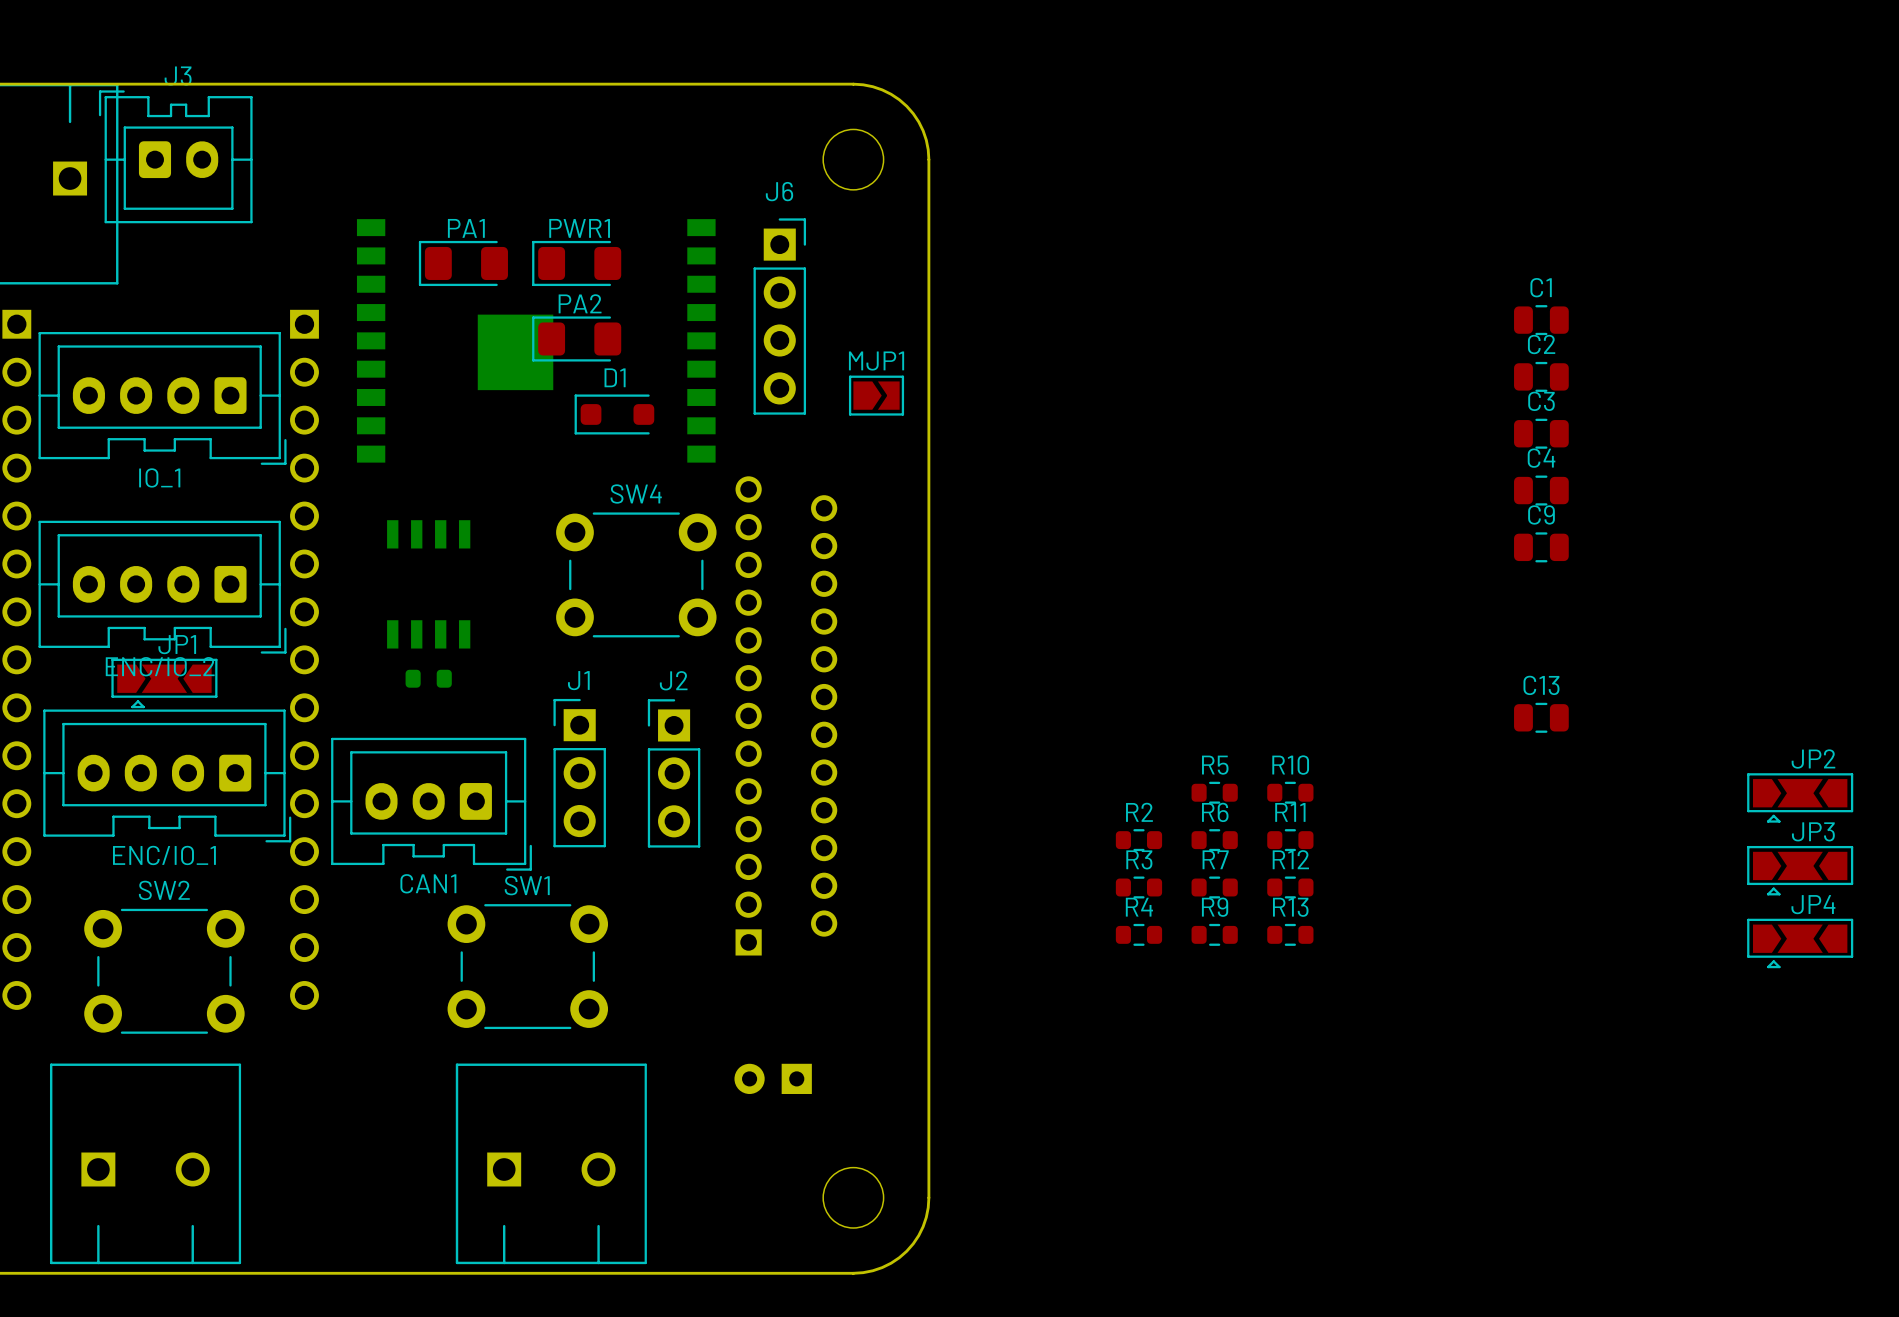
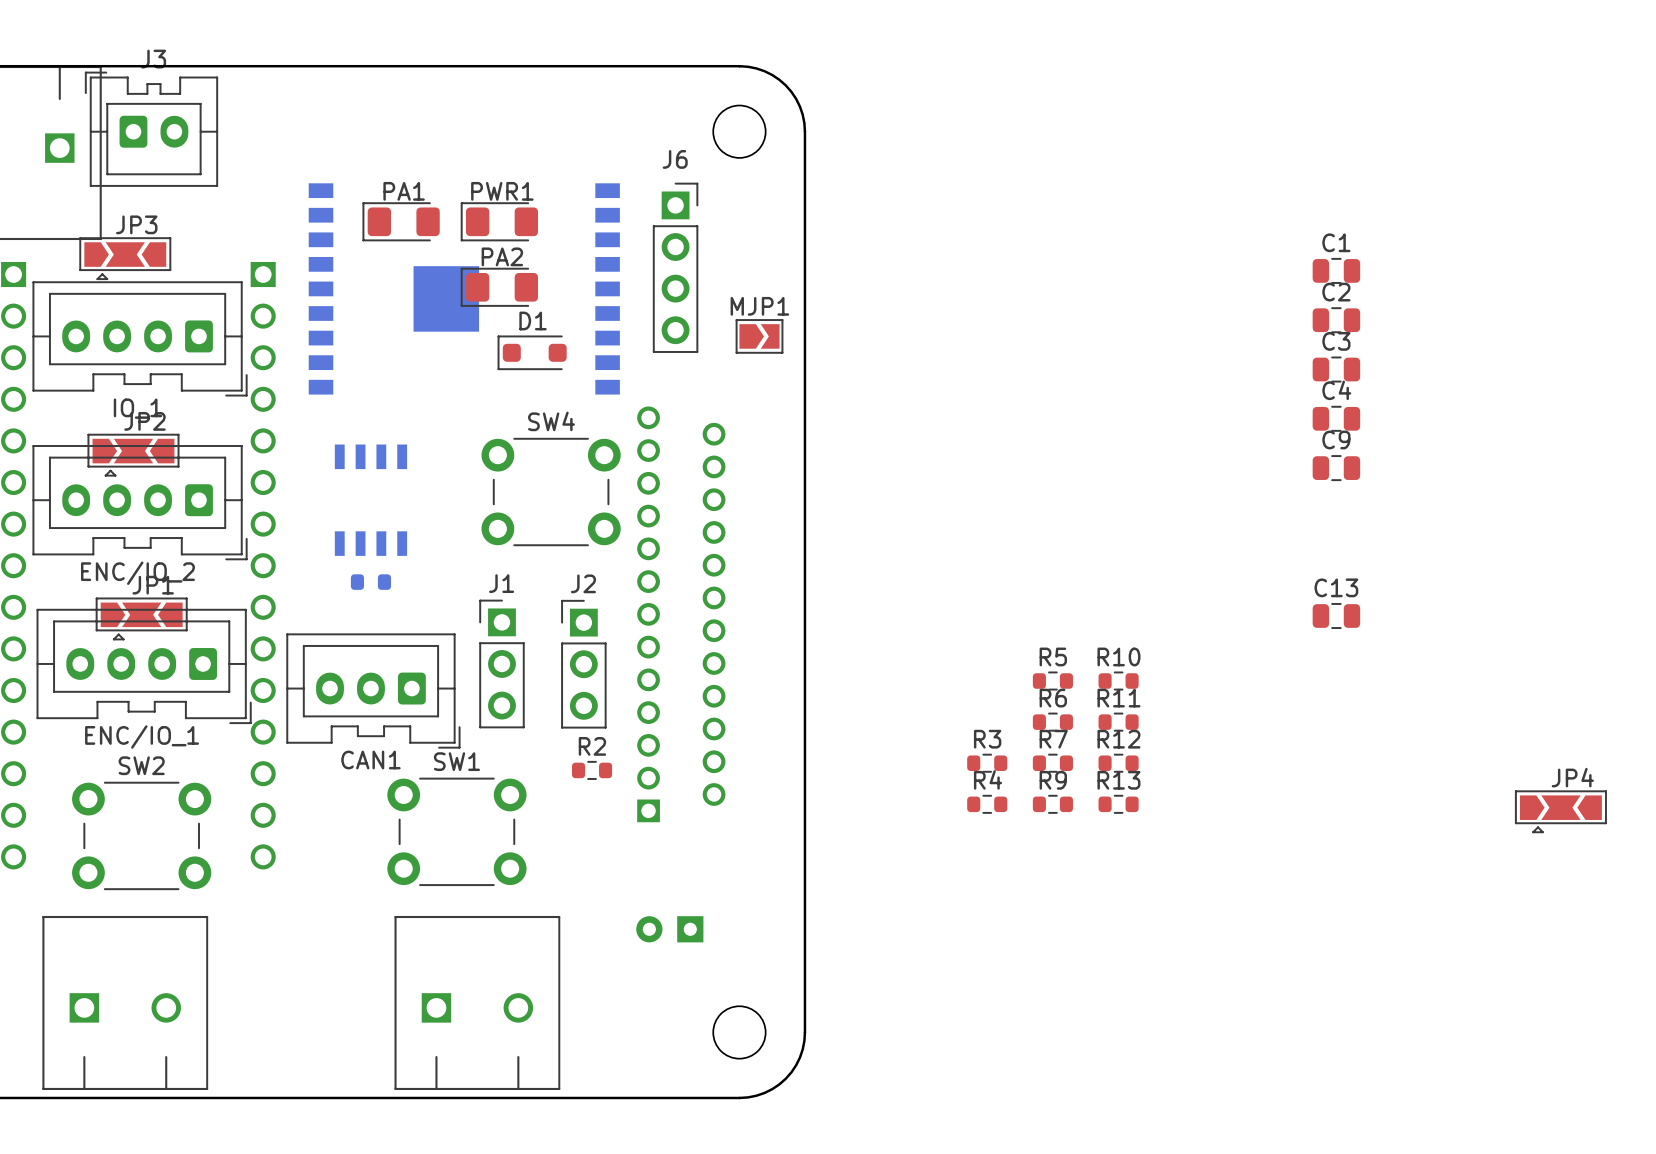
JP1 position: (164, 683) -> (141, 618)
JP2 position: (1800, 797) -> (133, 455)
R2 position: (1138, 840) -> (592, 770)
JP3 position: (1800, 870) -> (125, 258)

